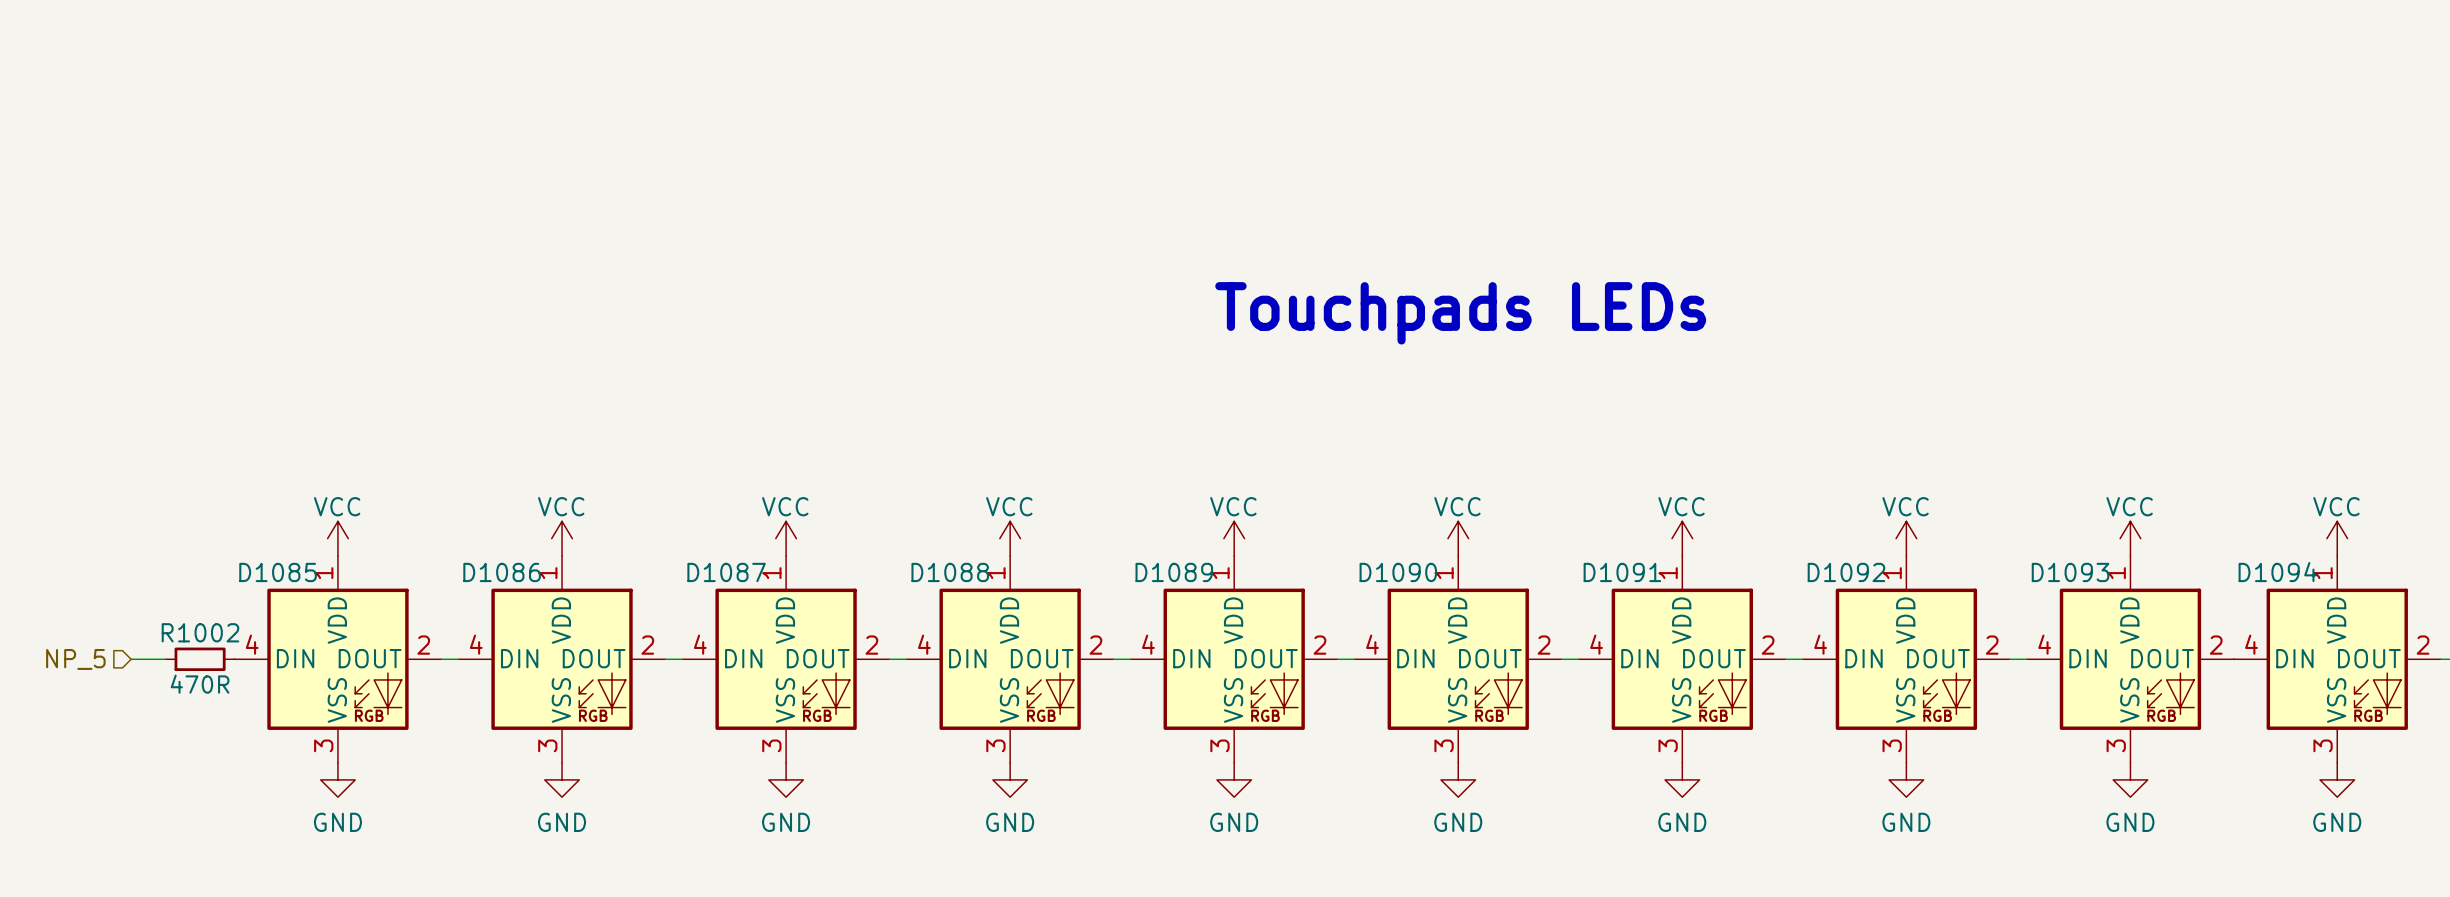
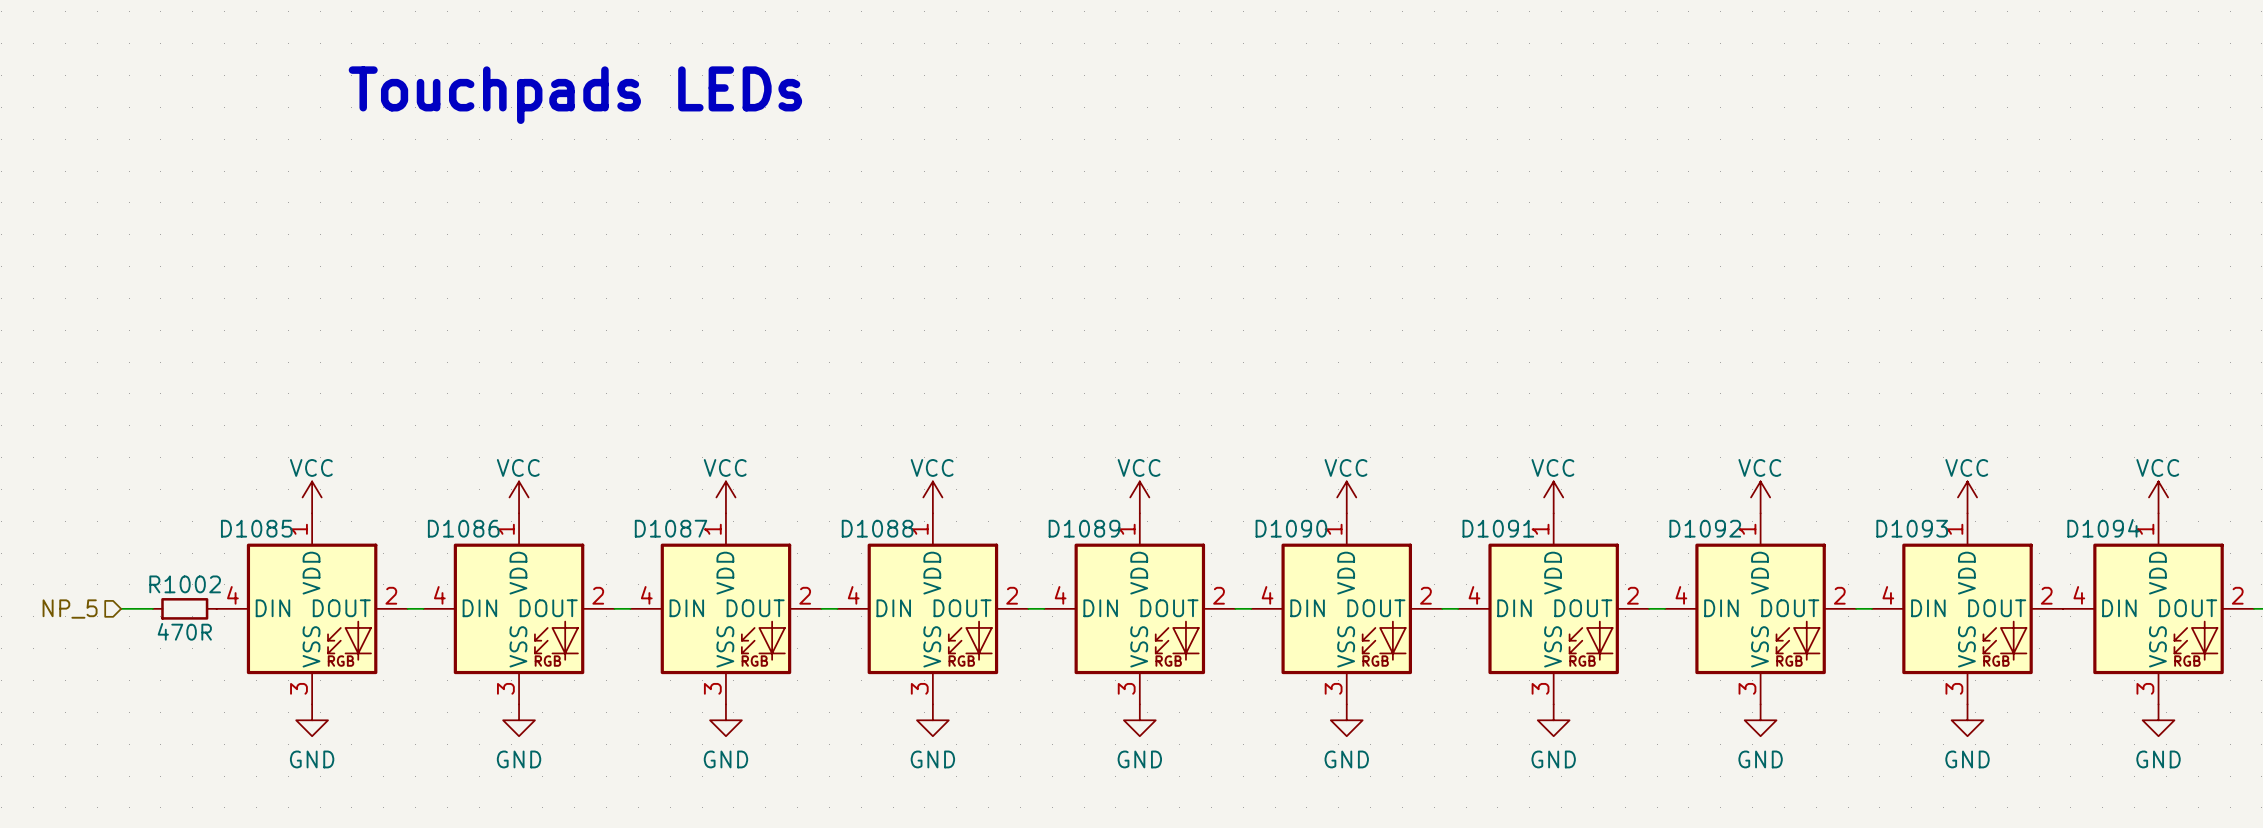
text: none -> Touchpads LEDs (575, 95)
text: Touchpads LEDs (1460, 313) -> none

